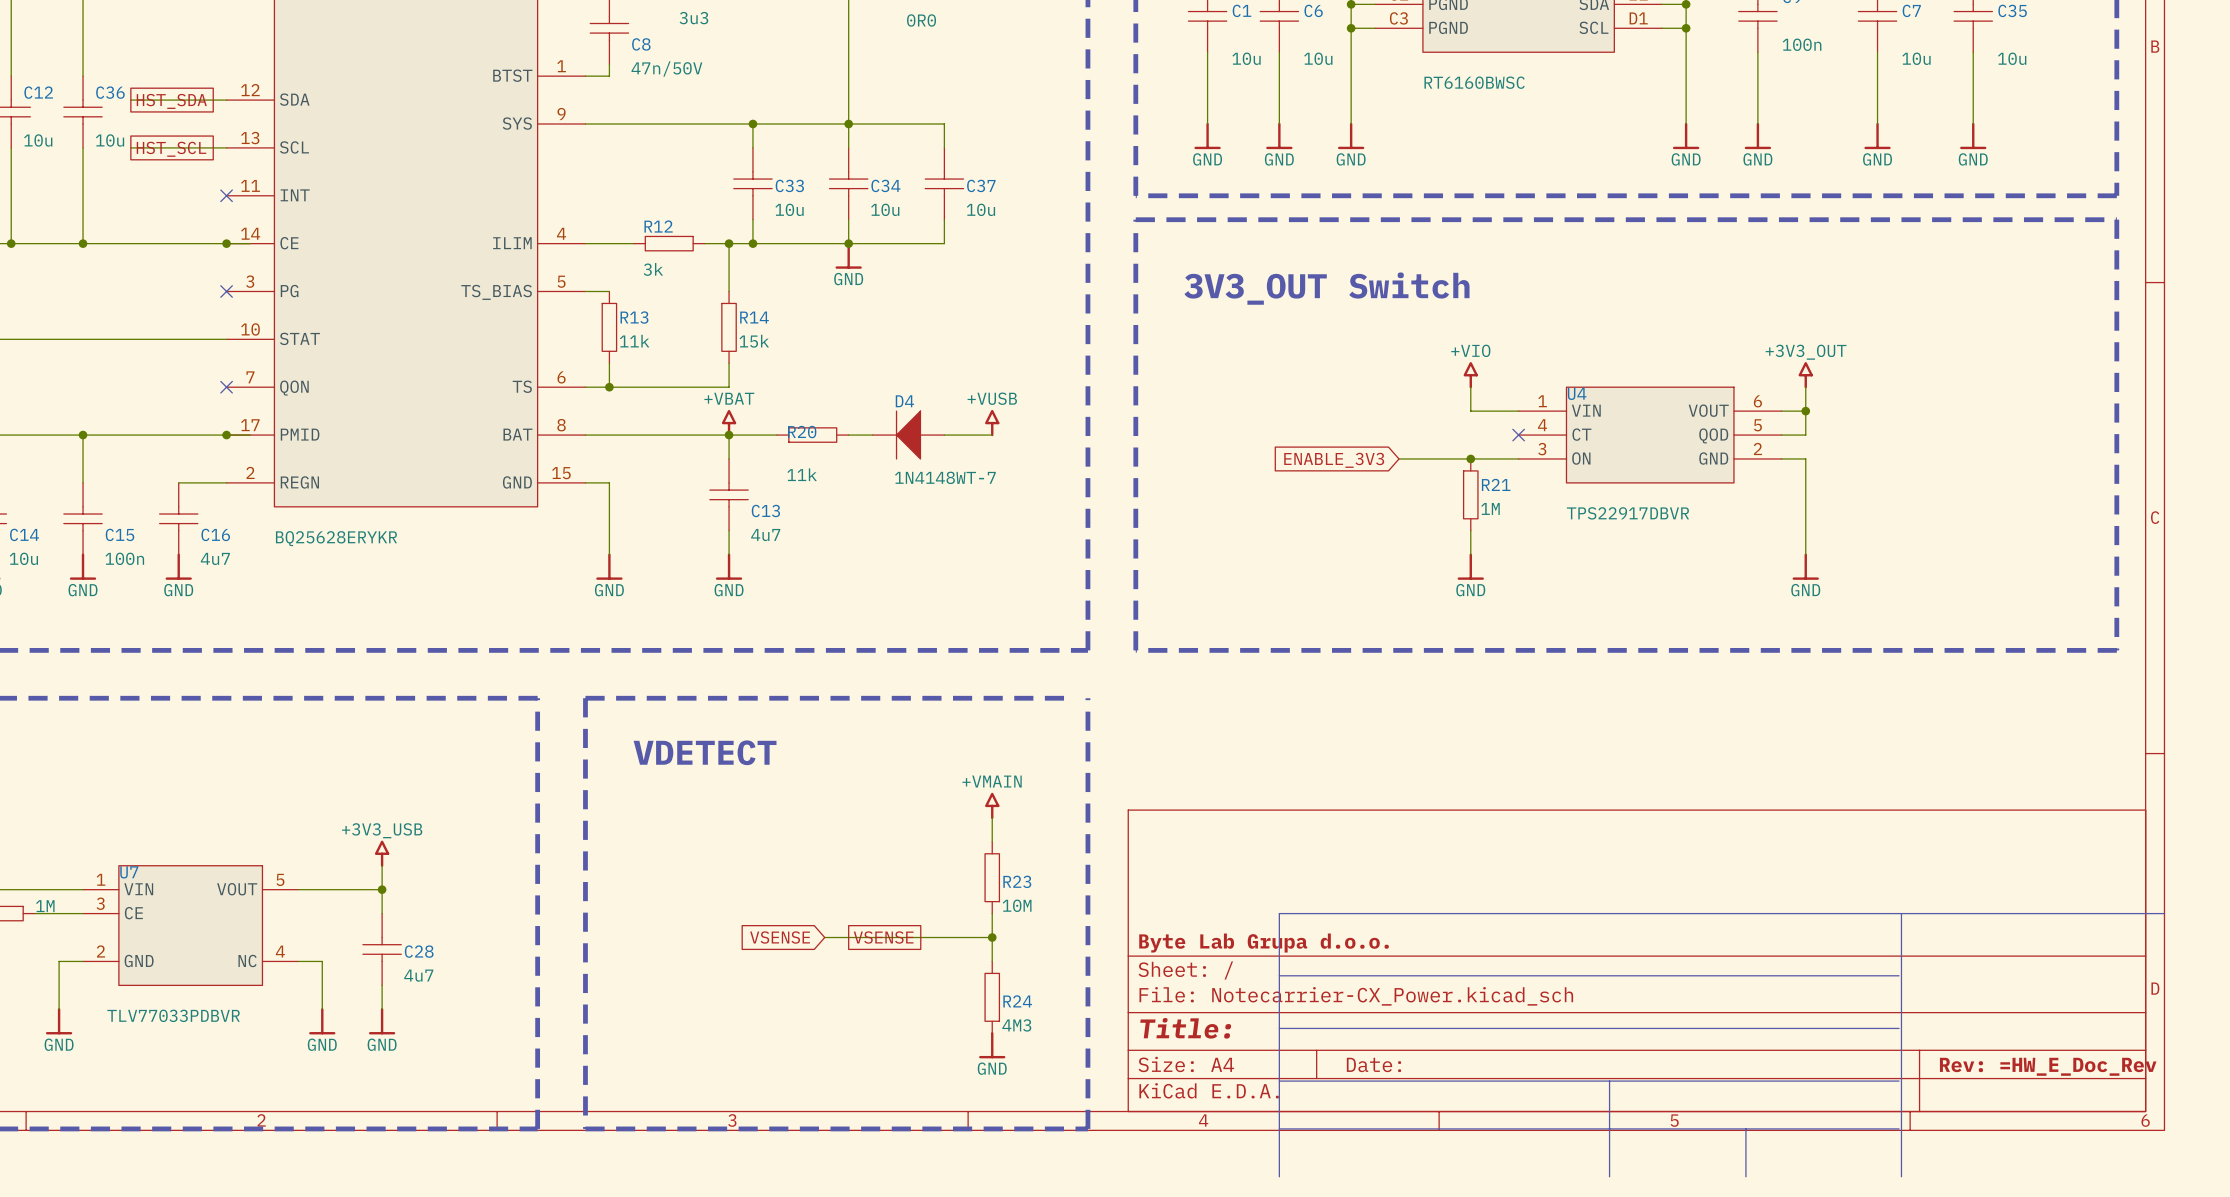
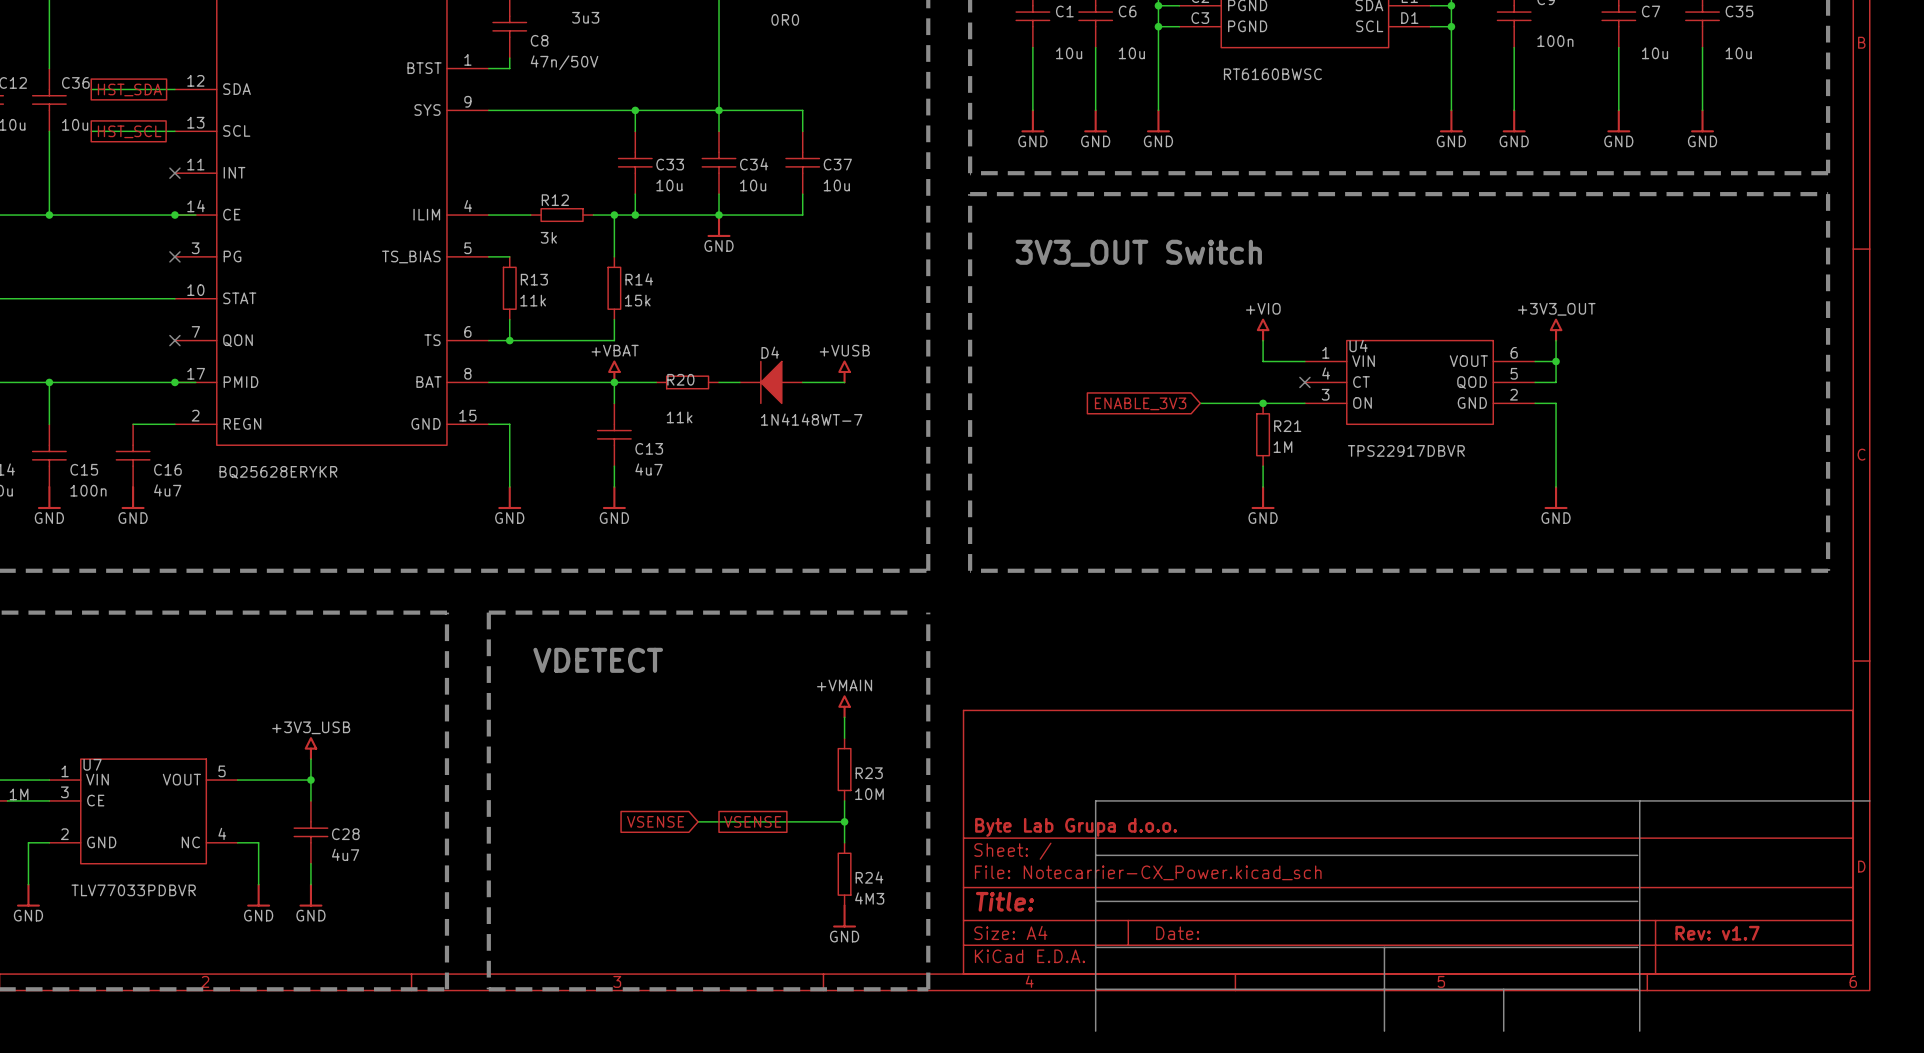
title block: Rev: =HW_E_Doc_Rev (2048, 1066) -> Rev: v1.7 (1717, 933)

